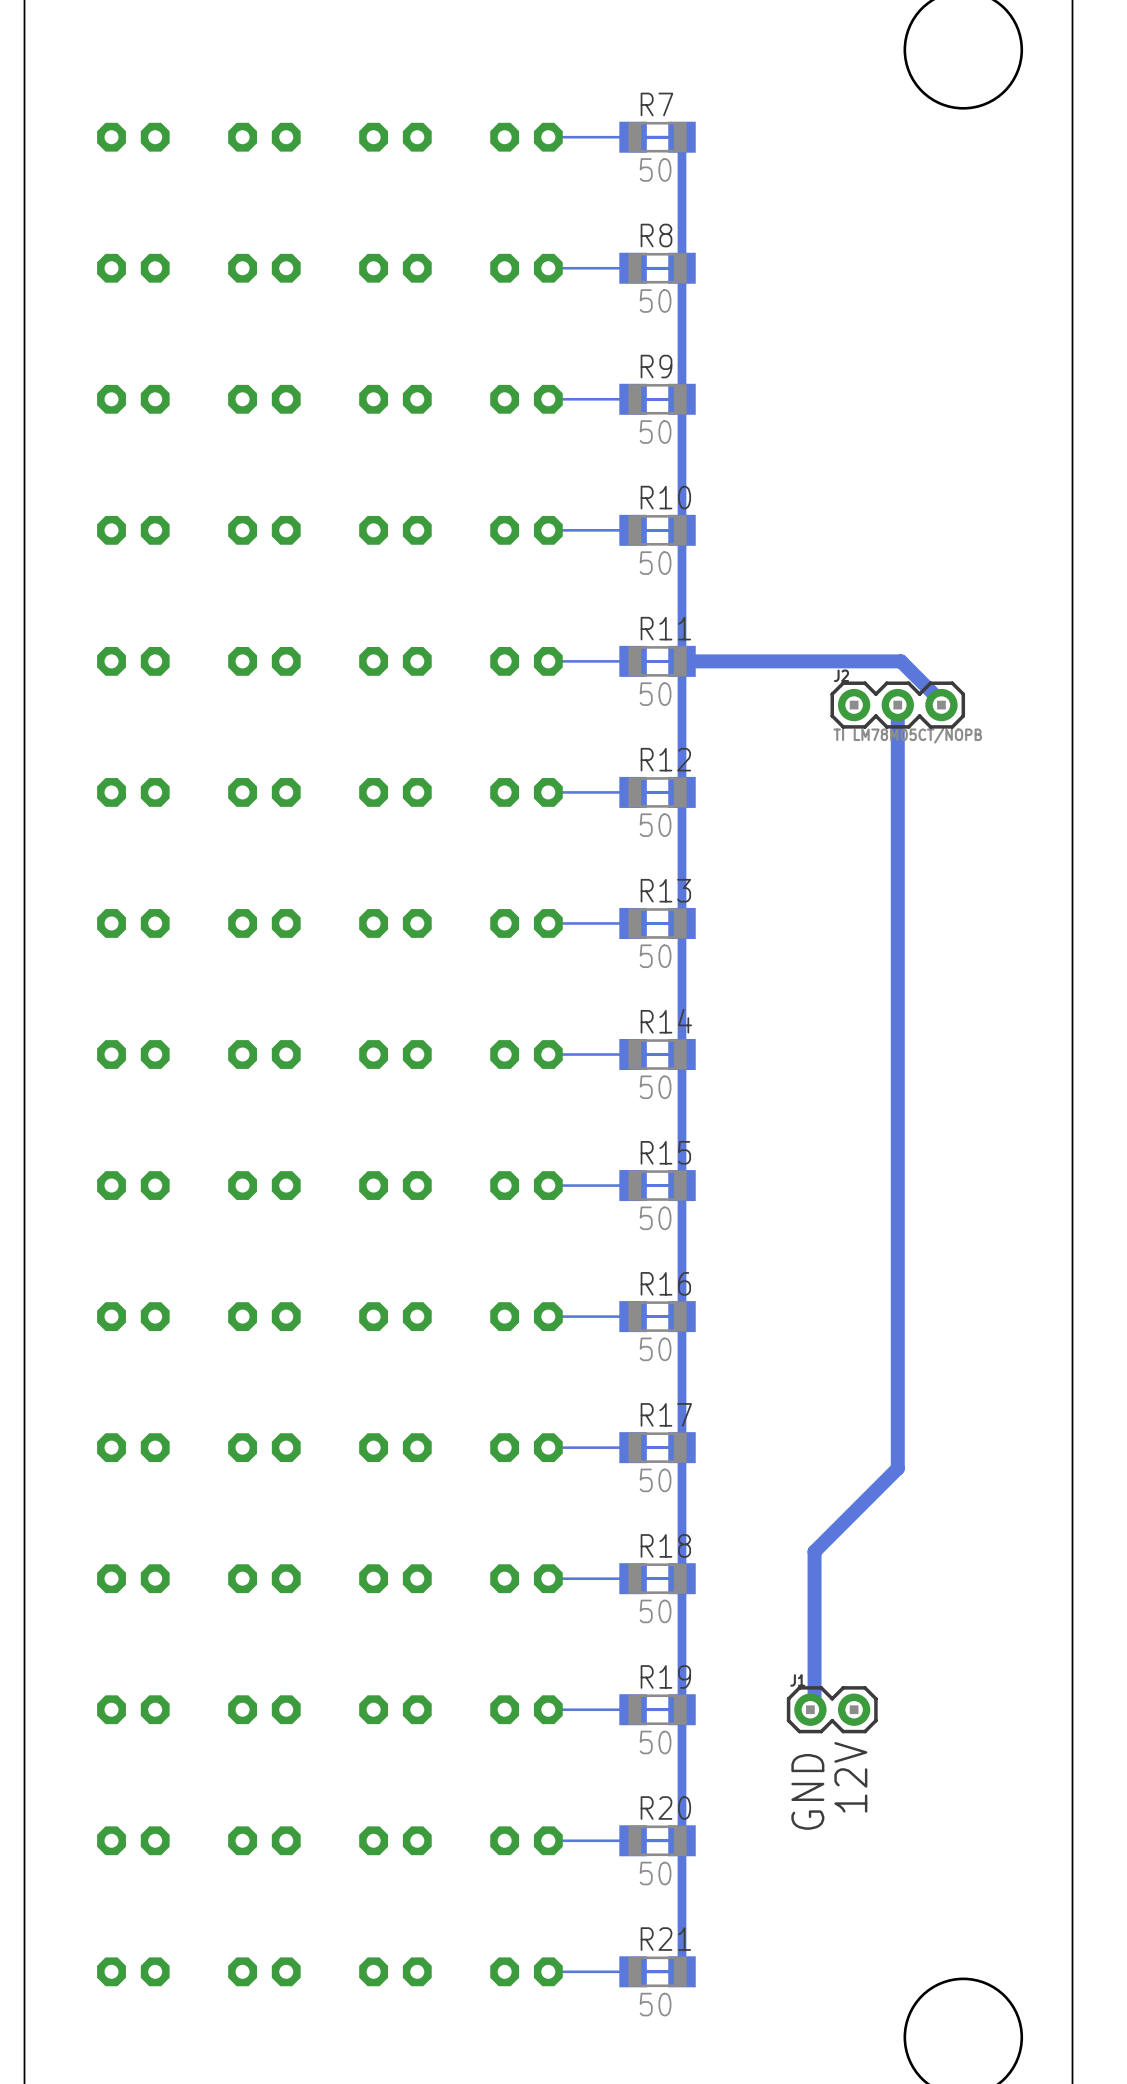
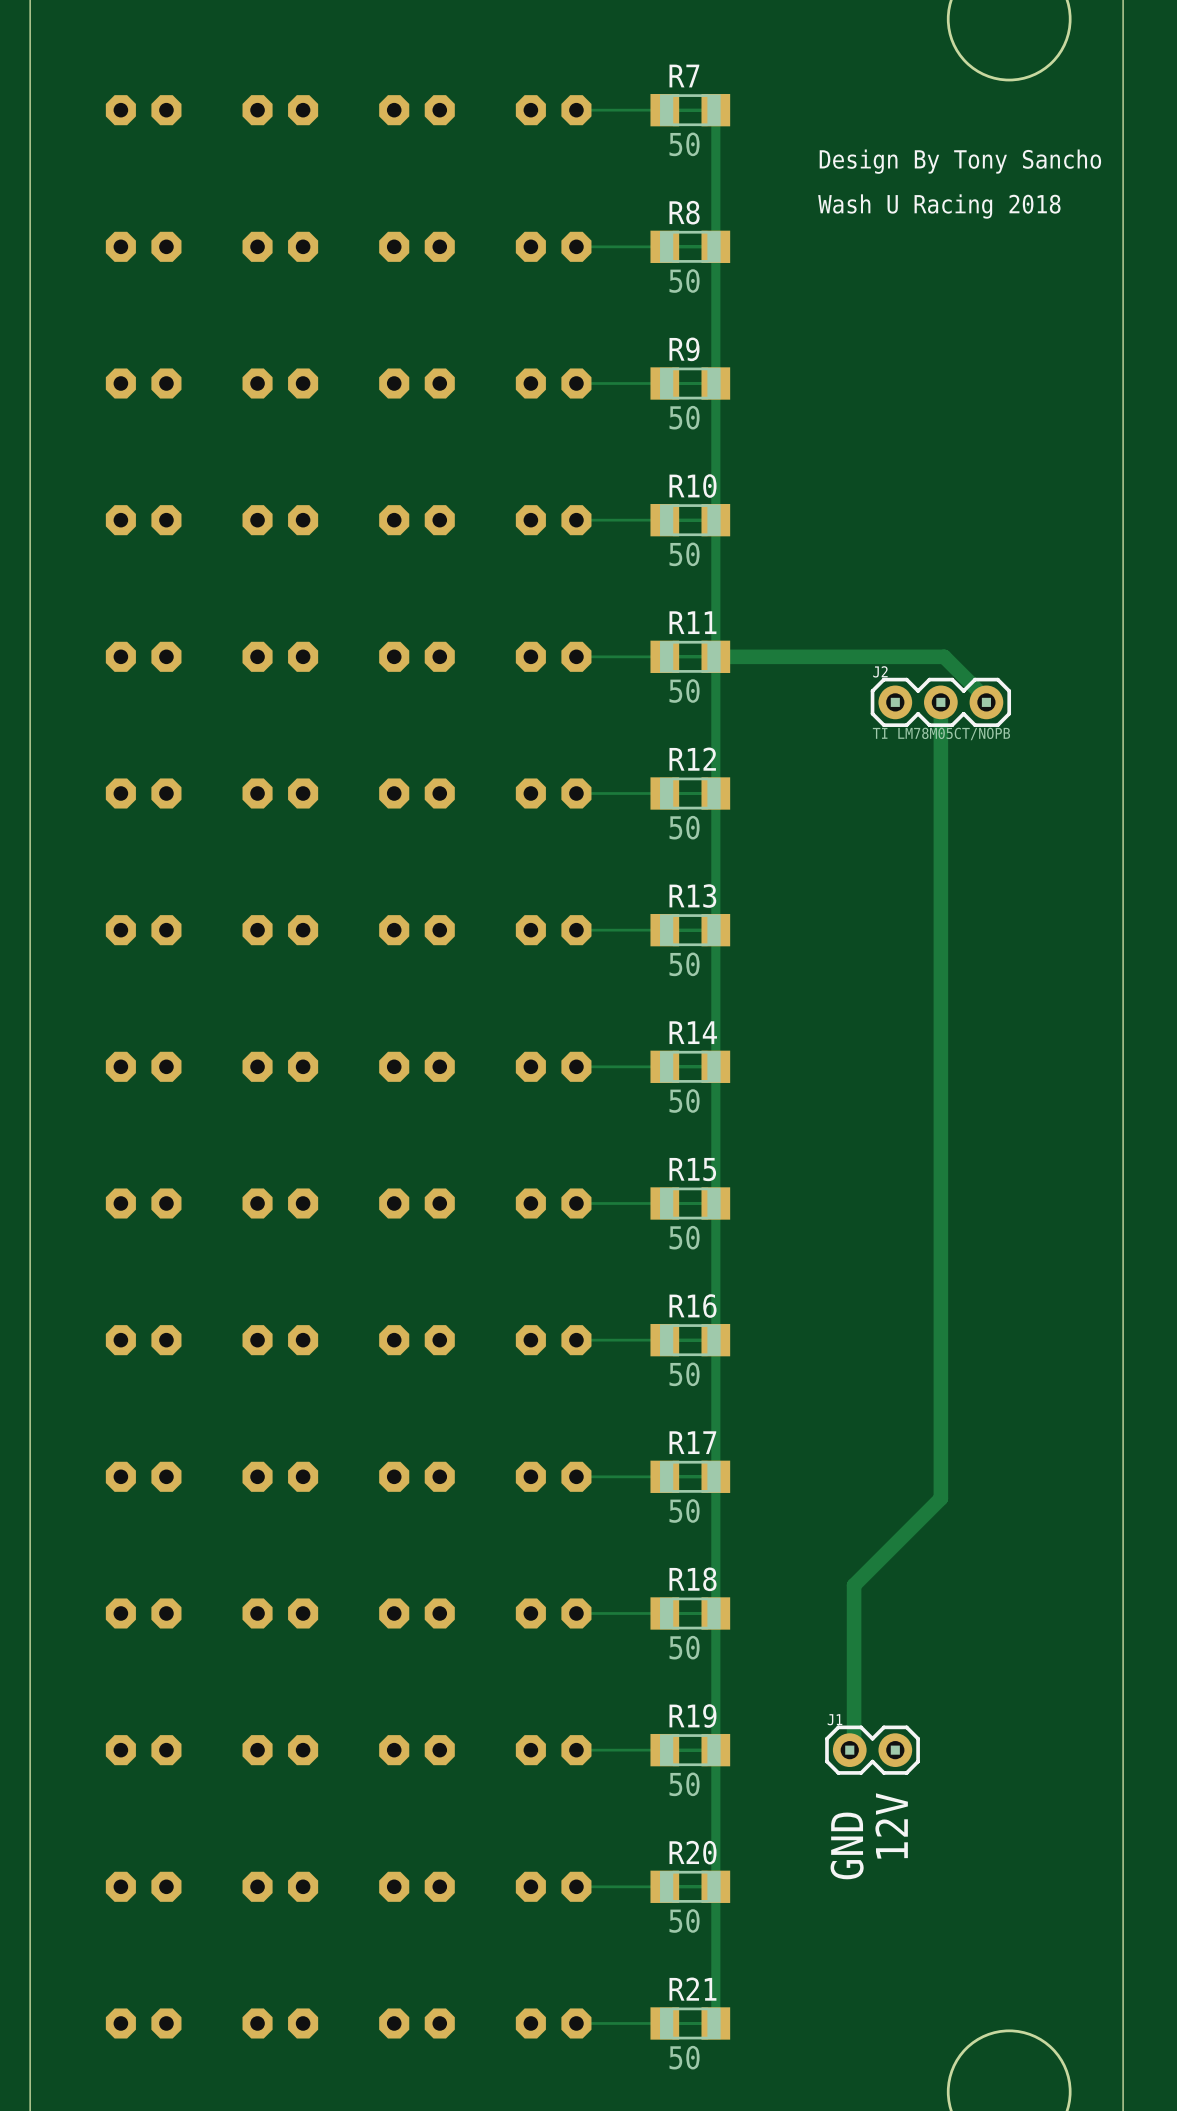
text: none -> Design By Tony Sancho (960, 161)
text: none -> Wash U Racing 2018 (939, 206)

